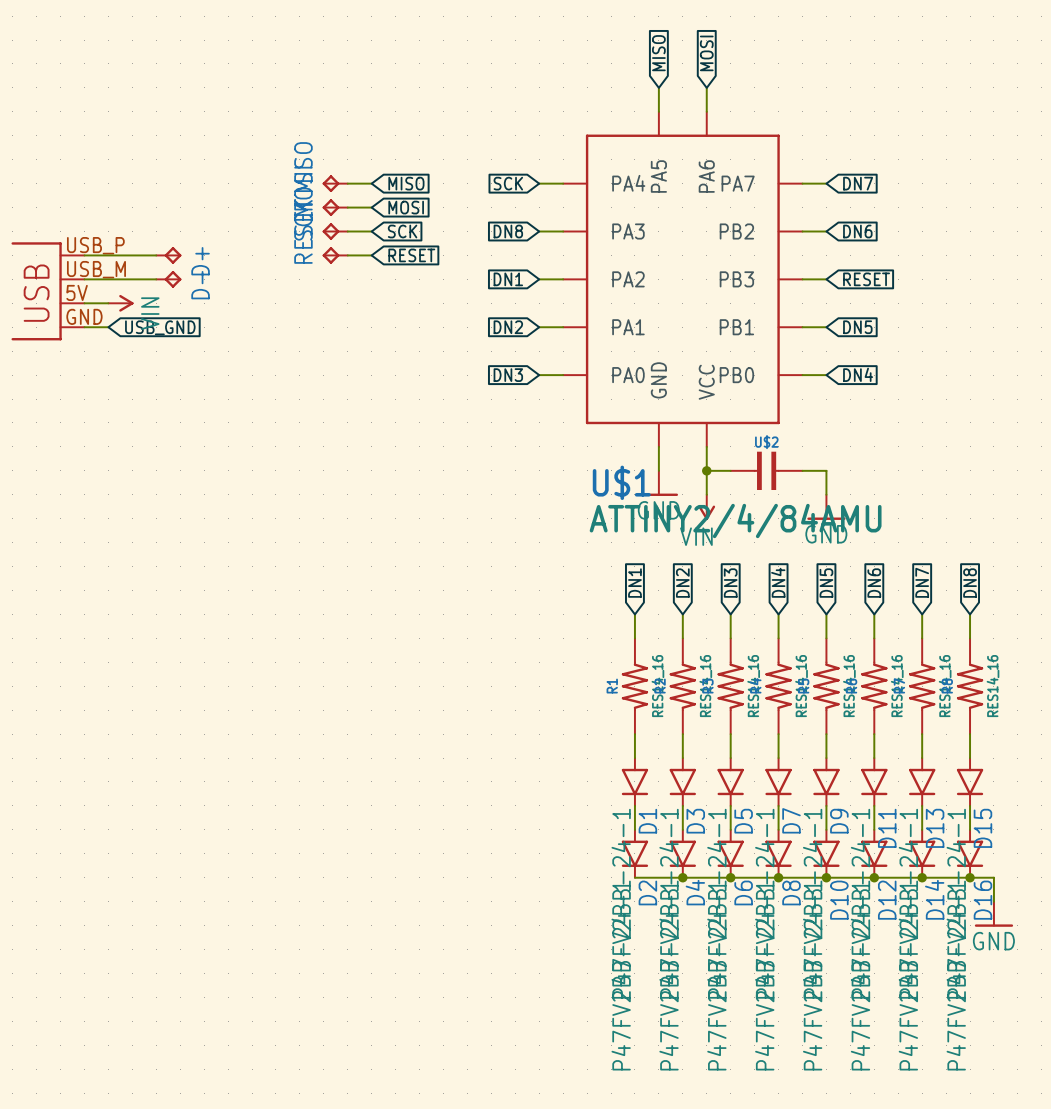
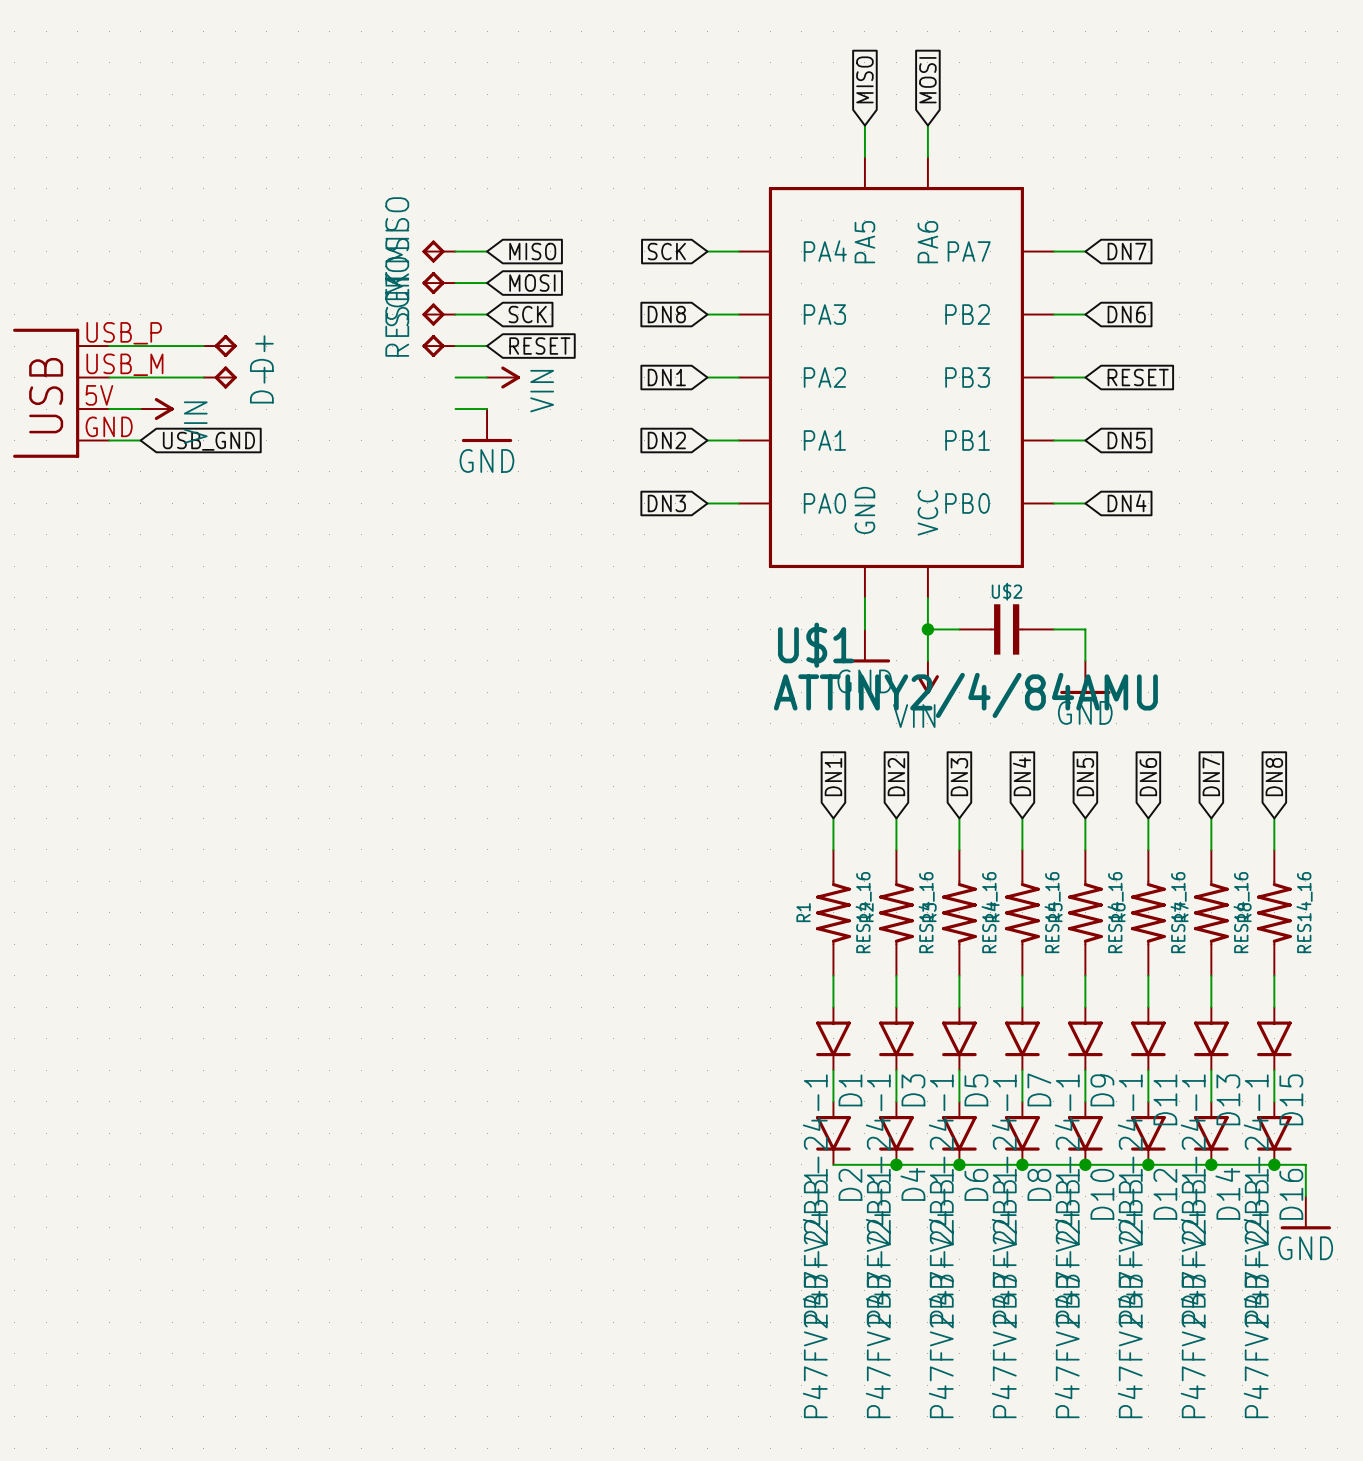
wire: none -> (455, 377) (487, 377)
power symbol: none -> VIN (503, 377)
wire: none -> (455, 409) (487, 409)
power symbol: none -> GND (487, 425)

